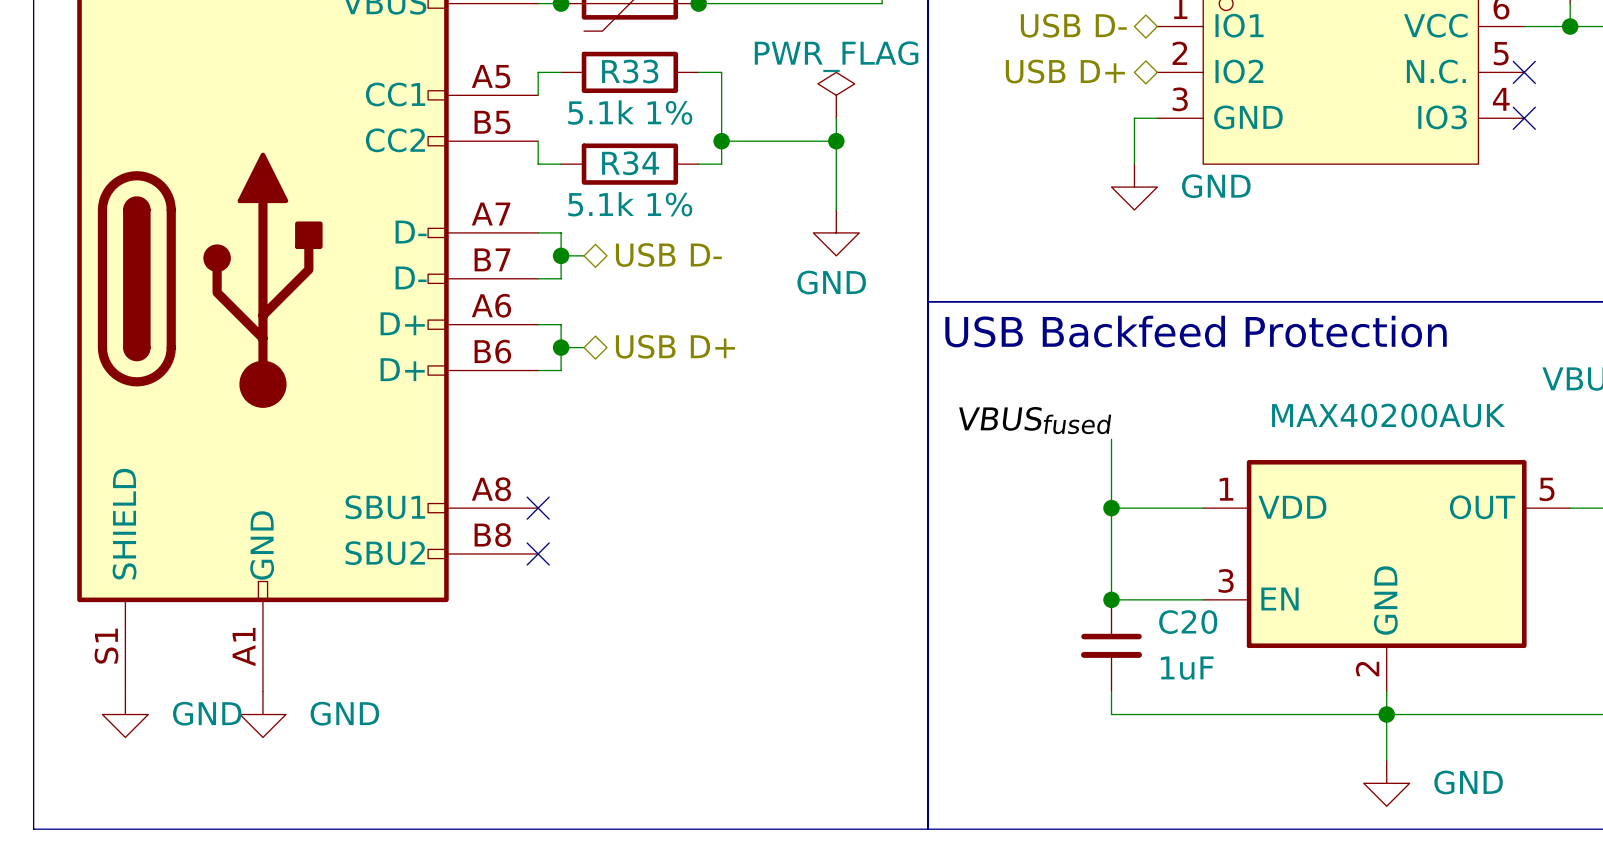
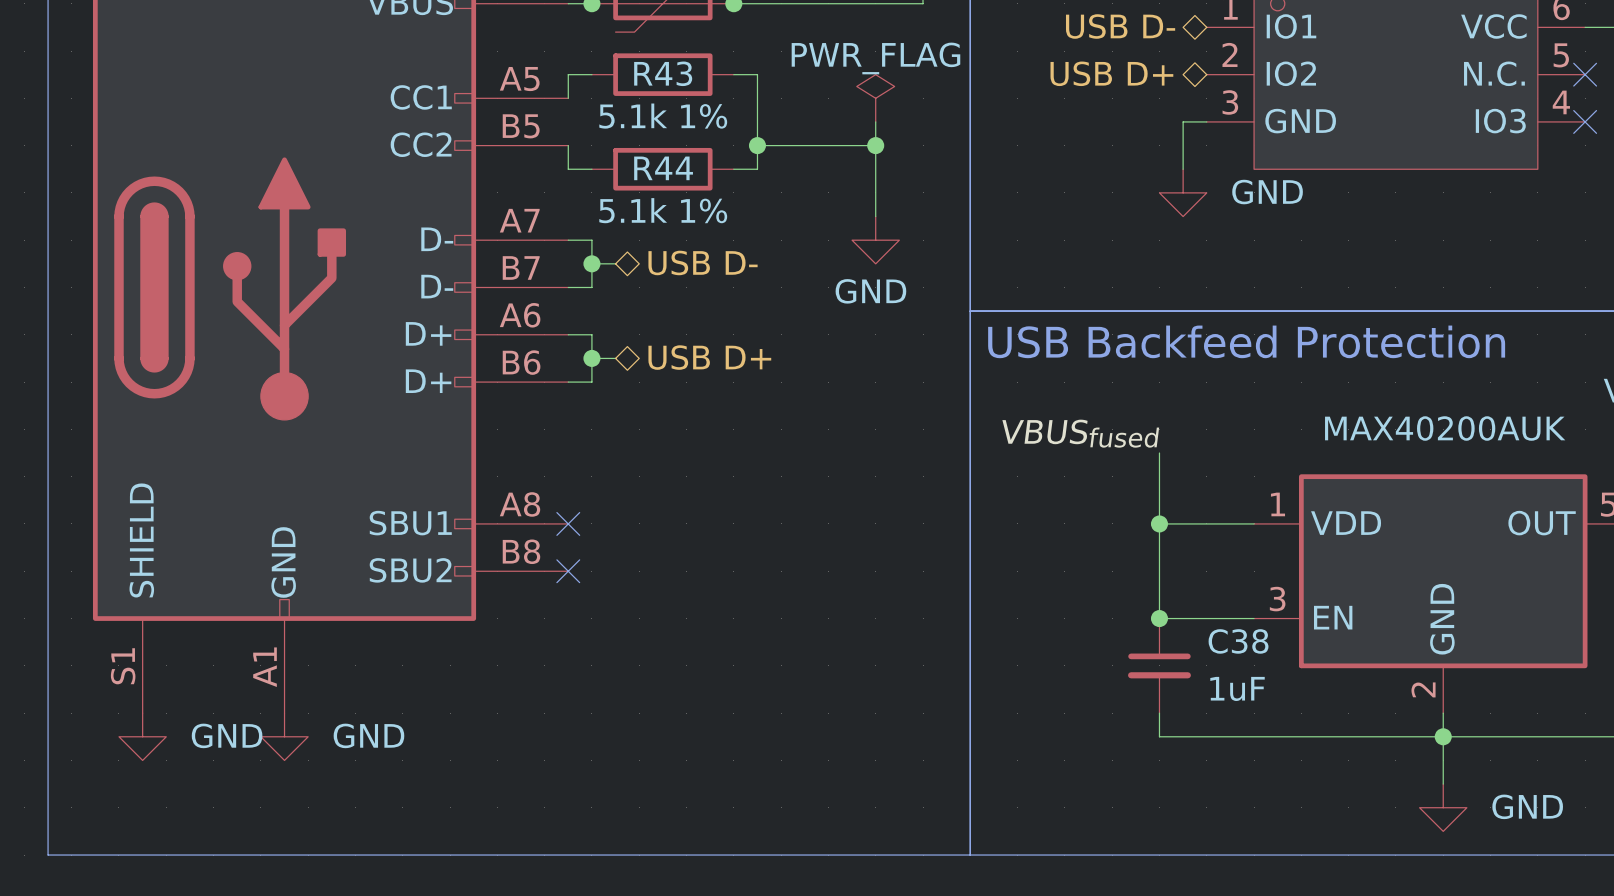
R33 name: R33 (630, 71) -> R43 (663, 73)
R34 name: R34 (630, 163) -> R44 (663, 168)
C20 name: C20 (1188, 622) -> C38 (1238, 641)

